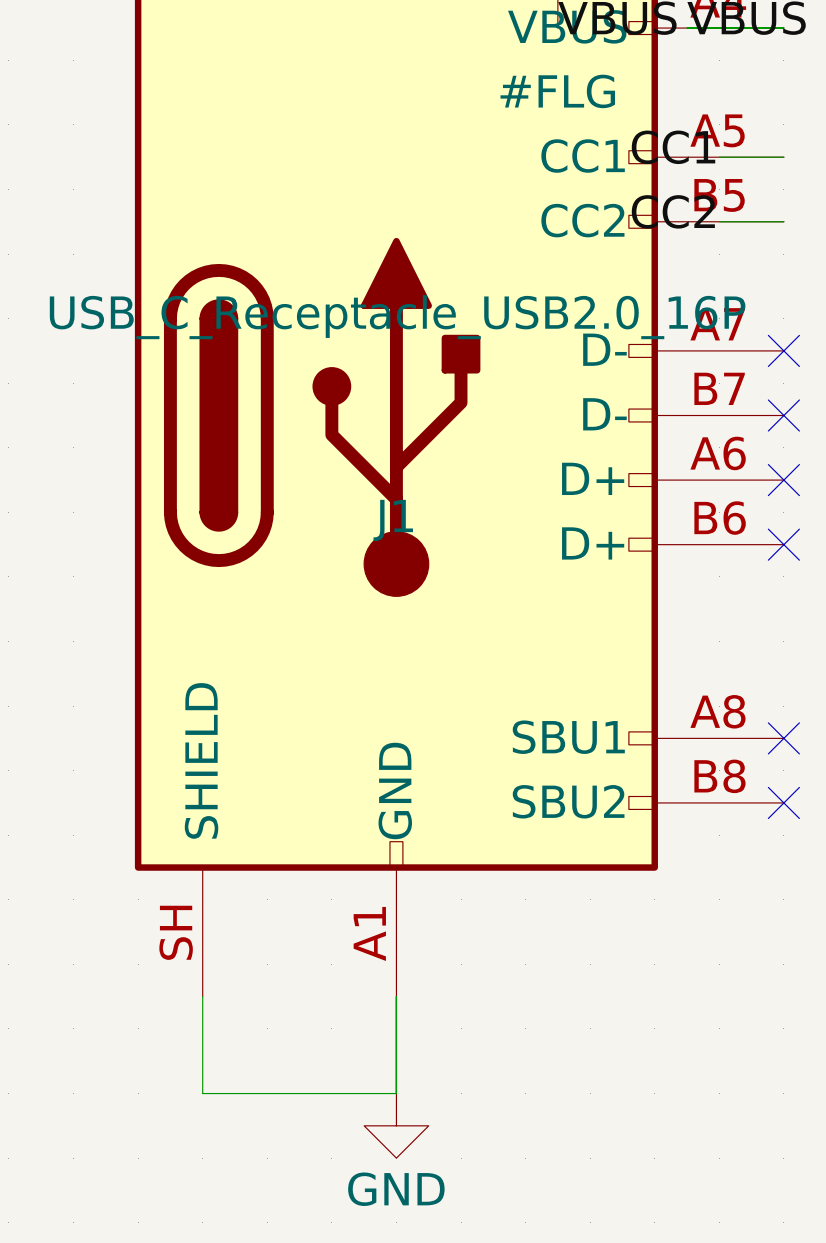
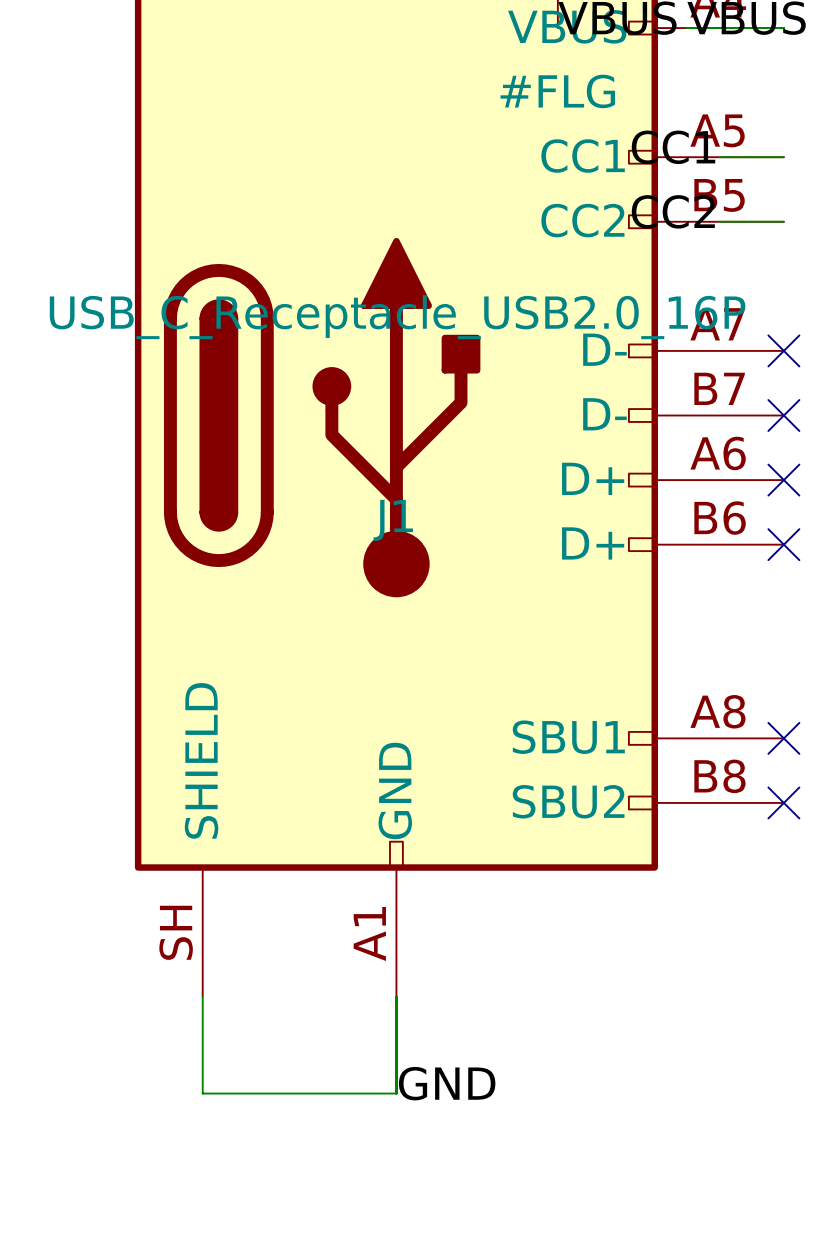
label: none -> GND (447, 1083)
power symbol: GND (396, 1125) -> none

